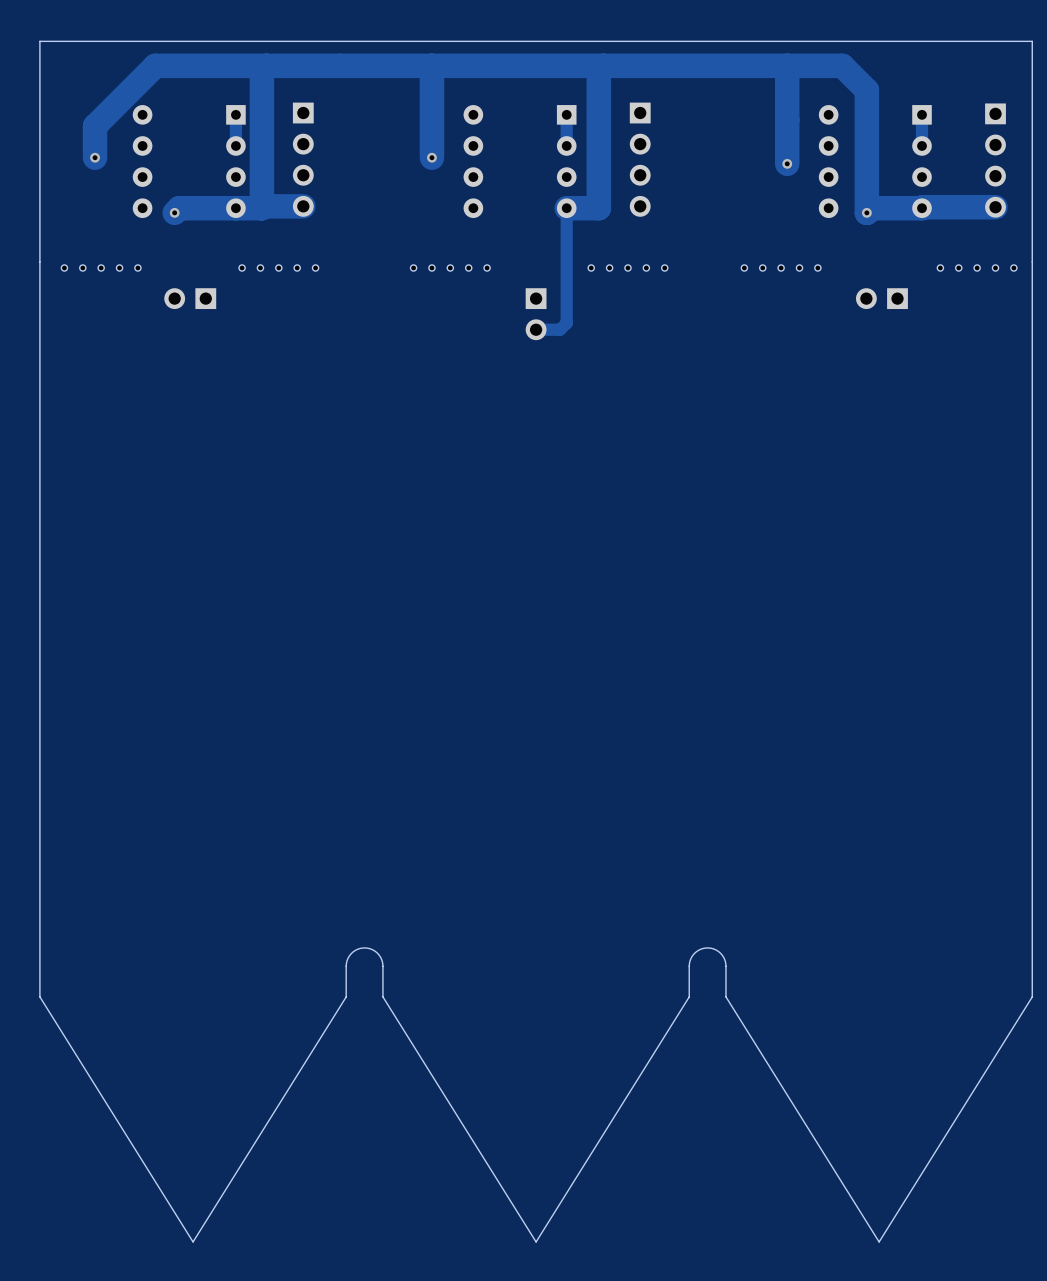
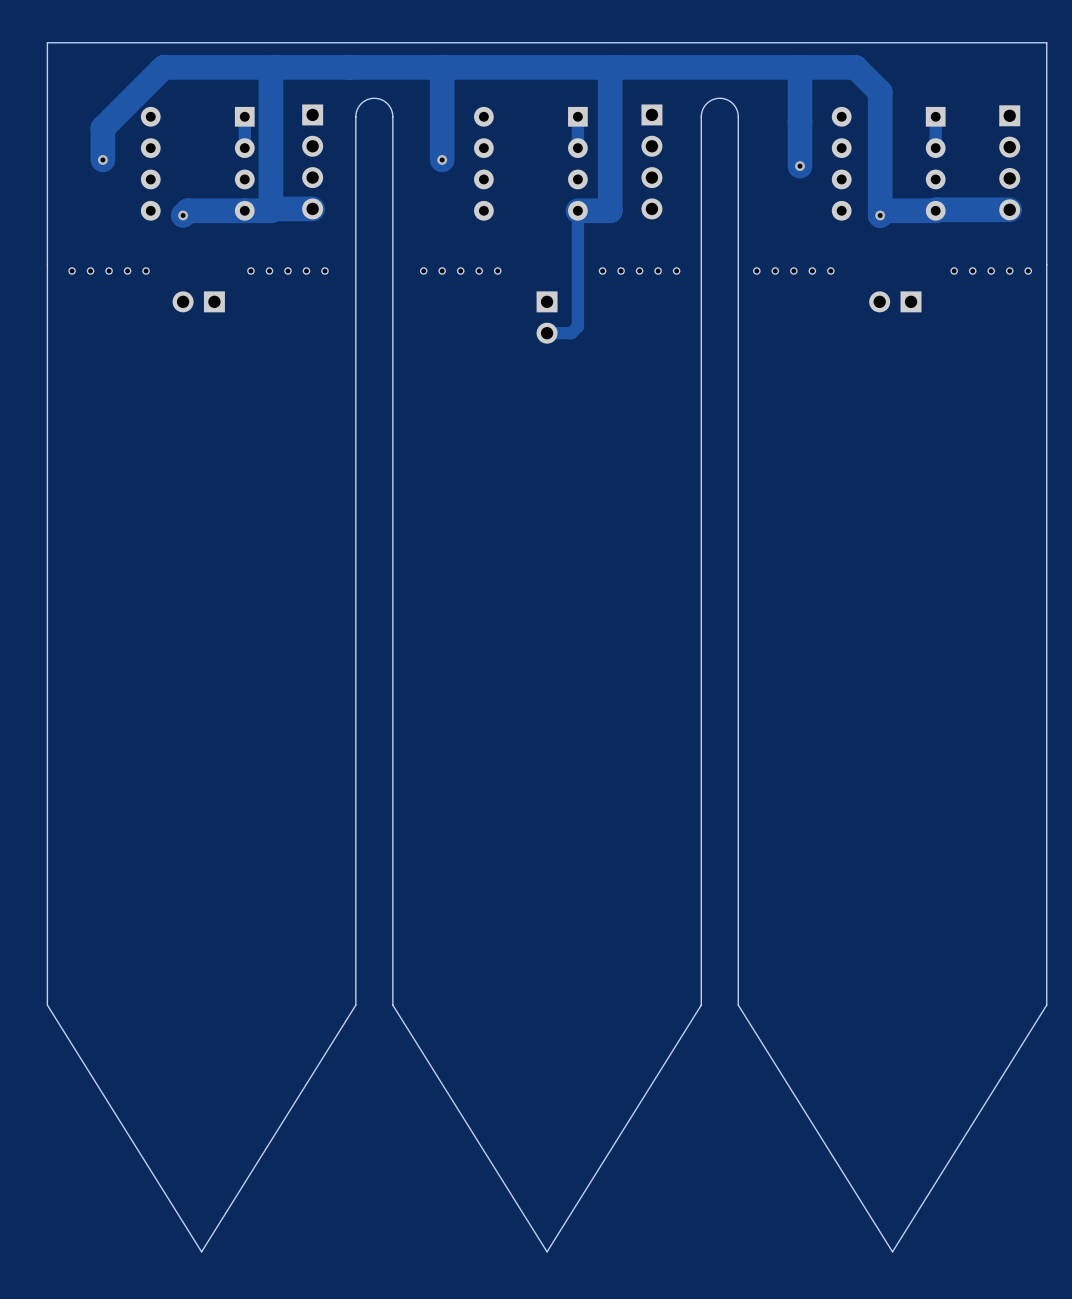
board edge: (382, 966) (377, 953) (364, 947) (351, 953) (346, 966) -> (392, 974) (392, 116) (387, 103) (374, 98) (361, 103) (355, 116) (355, 974)
board edge: (725, 966) (720, 953) (707, 947) (694, 953) (689, 966) -> (738, 974) (738, 116) (732, 103) (719, 98) (706, 103) (701, 116) (701, 974)

